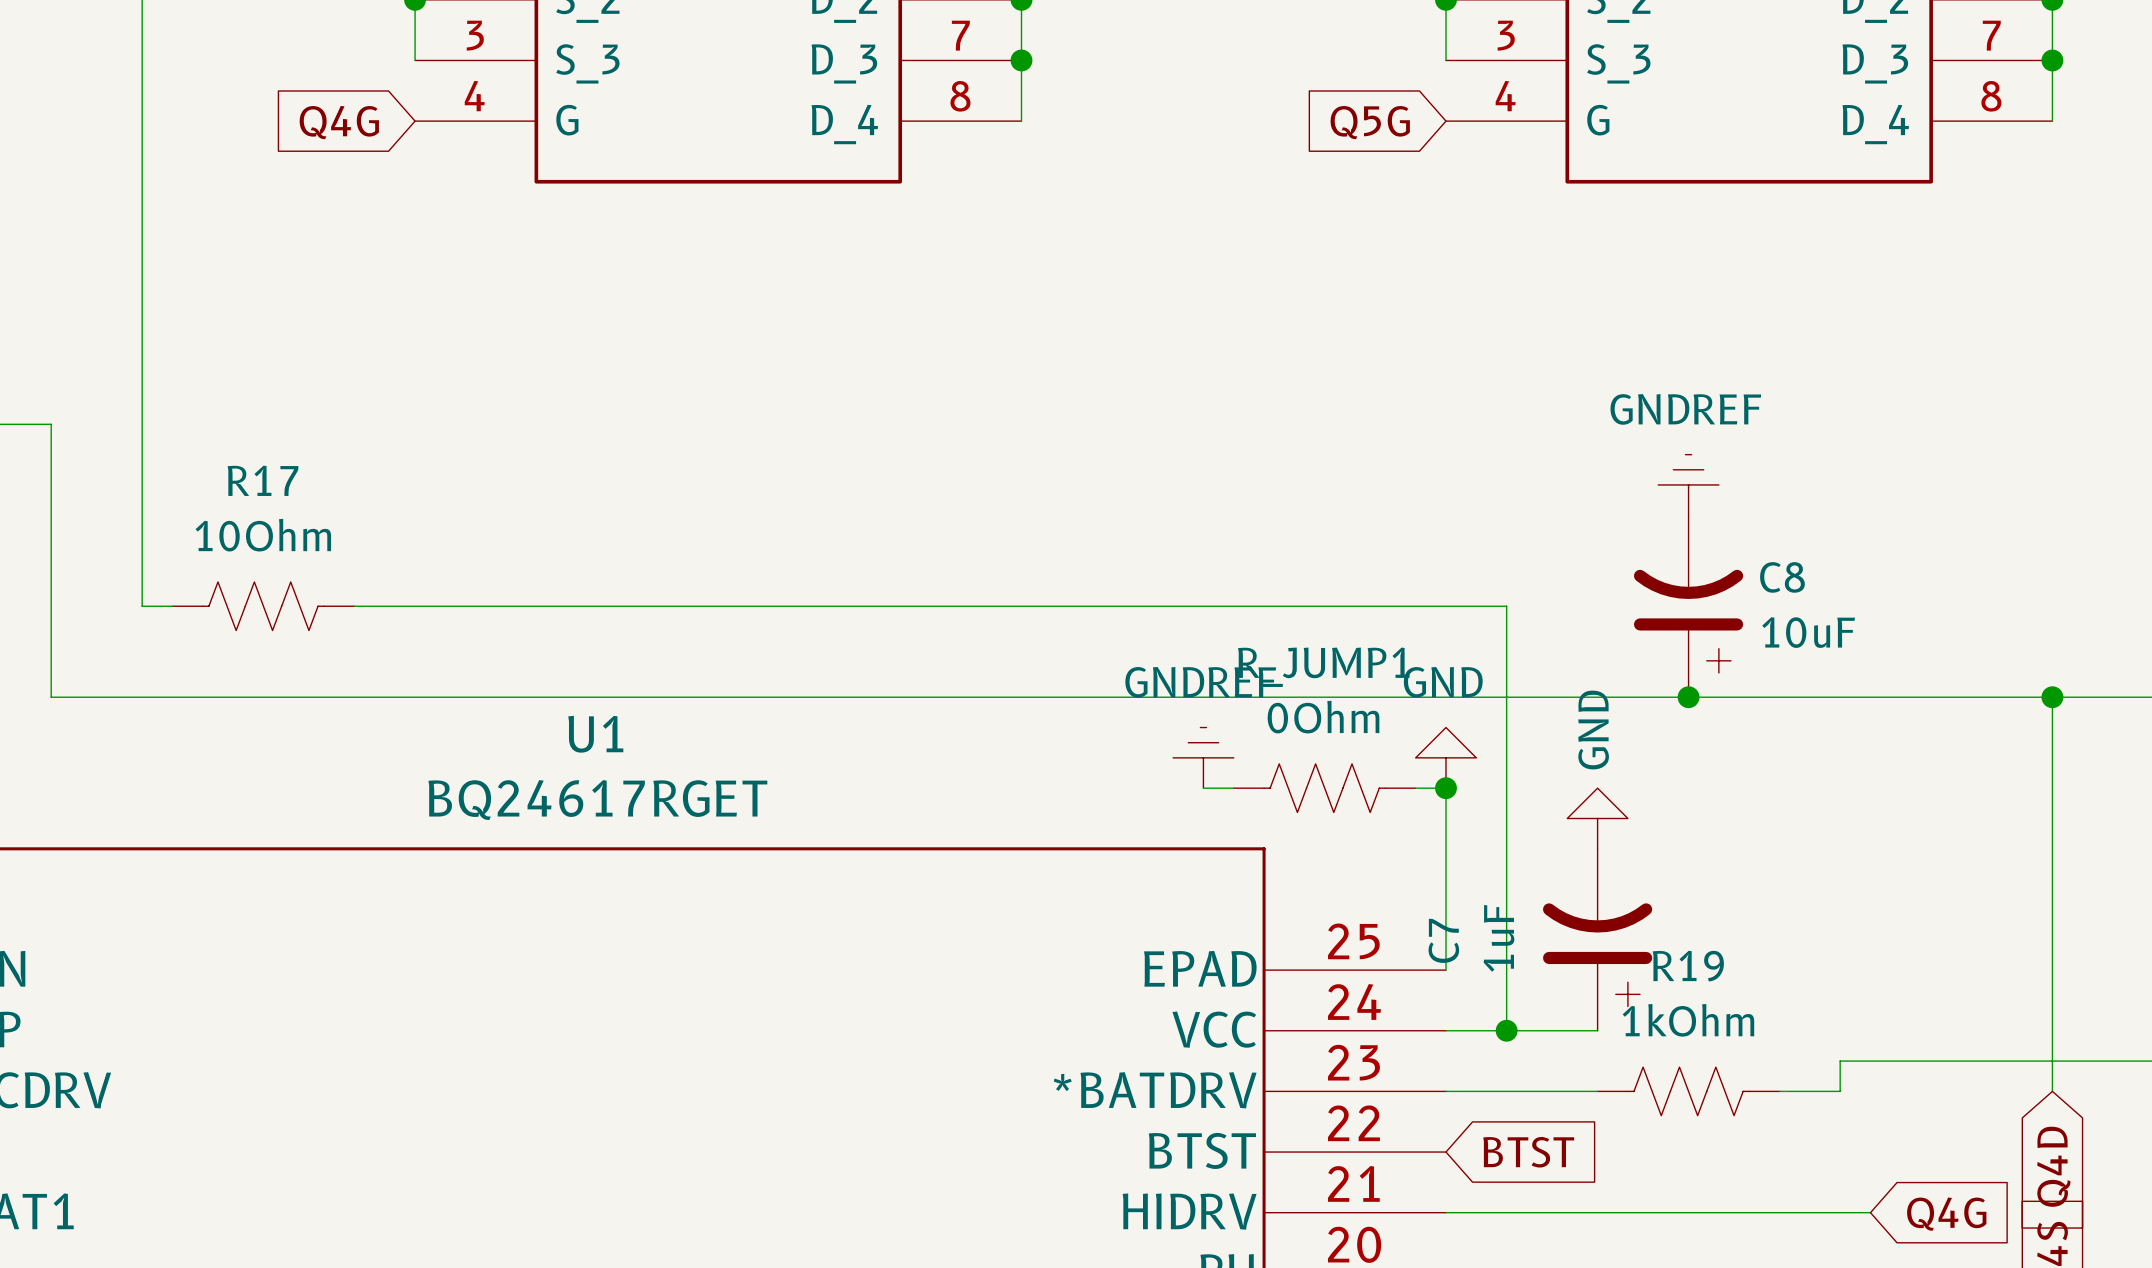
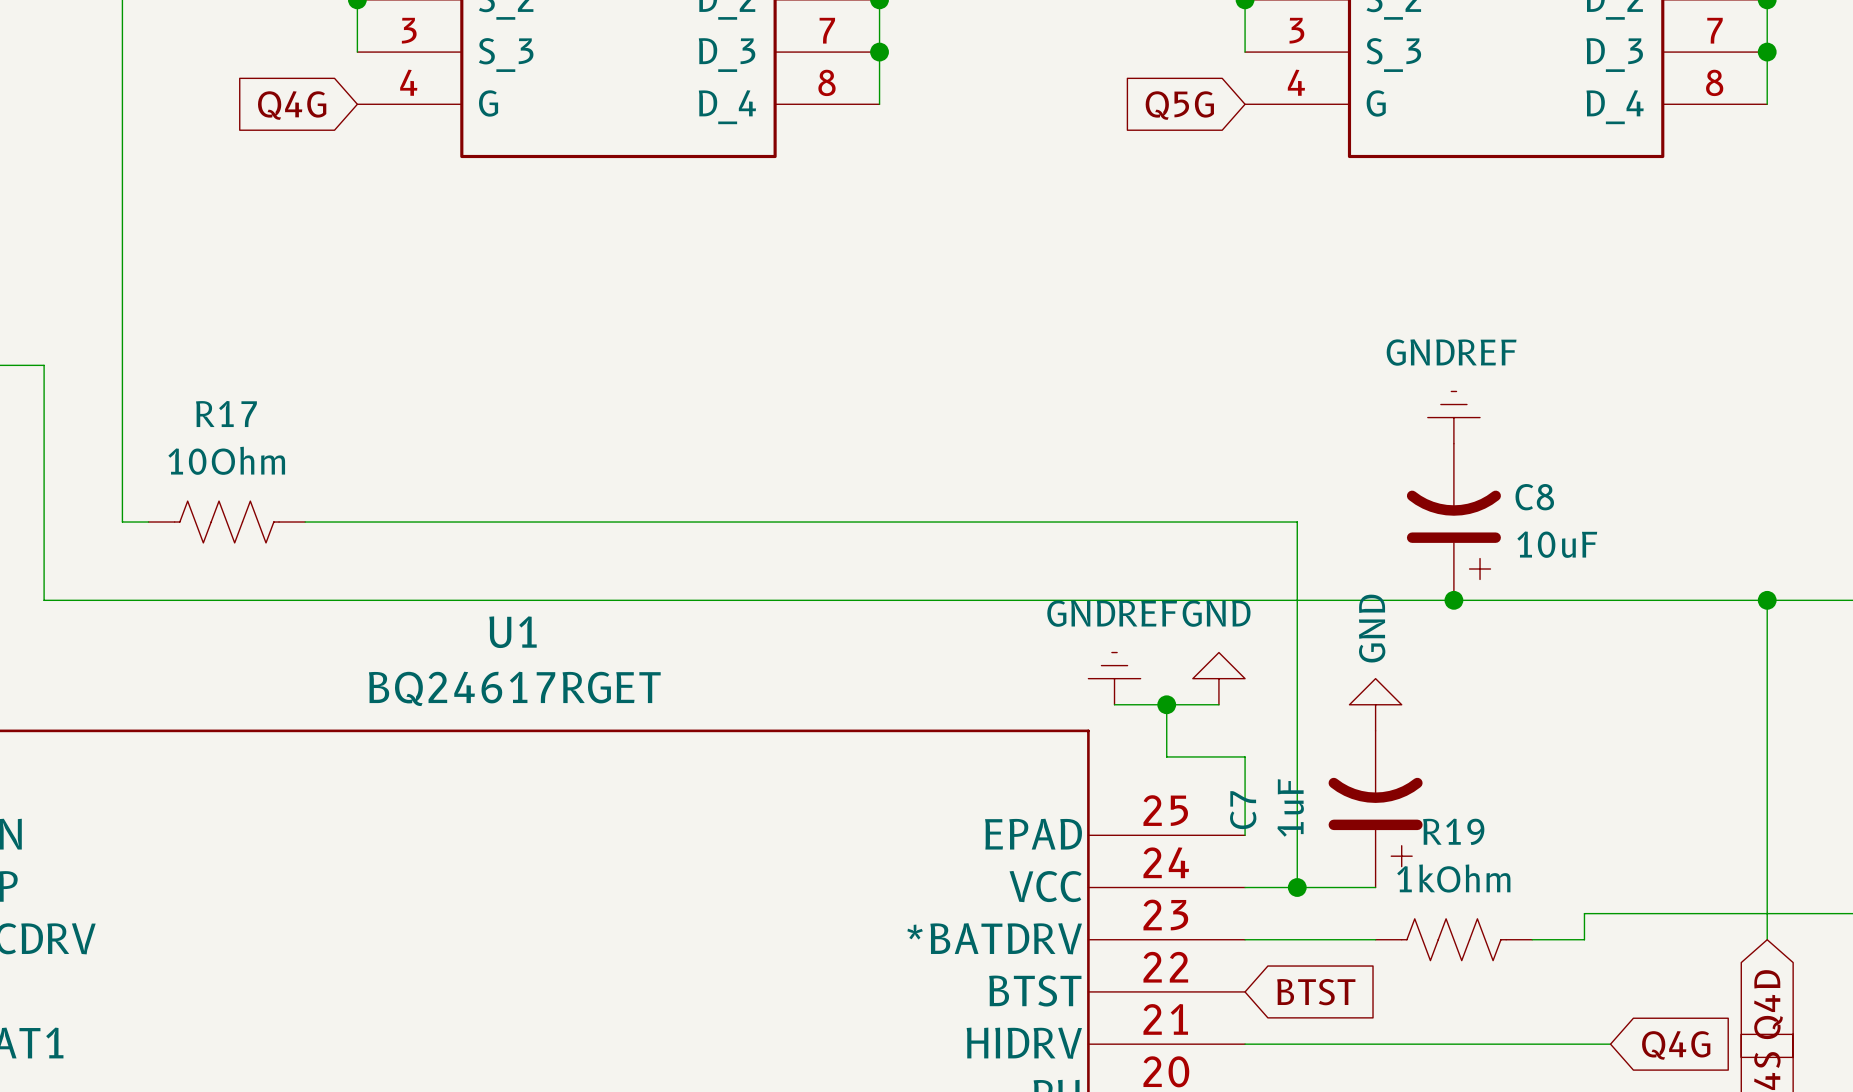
power symbol position: GNDREF (1203, 757) -> GNDREF (1114, 678)
power symbol position: GND (1445, 757) -> GND (1218, 678)
wire: (1203, 788) (1233, 788) -> none
R_JUMP1: 0Ohm (1324, 788) -> none
wire: (1415, 788) (1445, 788) (1445, 879) -> (1166, 704) (1166, 756) (1245, 756)
junction position: (1445, 788) -> (1166, 704)
wire: none -> (1114, 704) (1218, 704)

